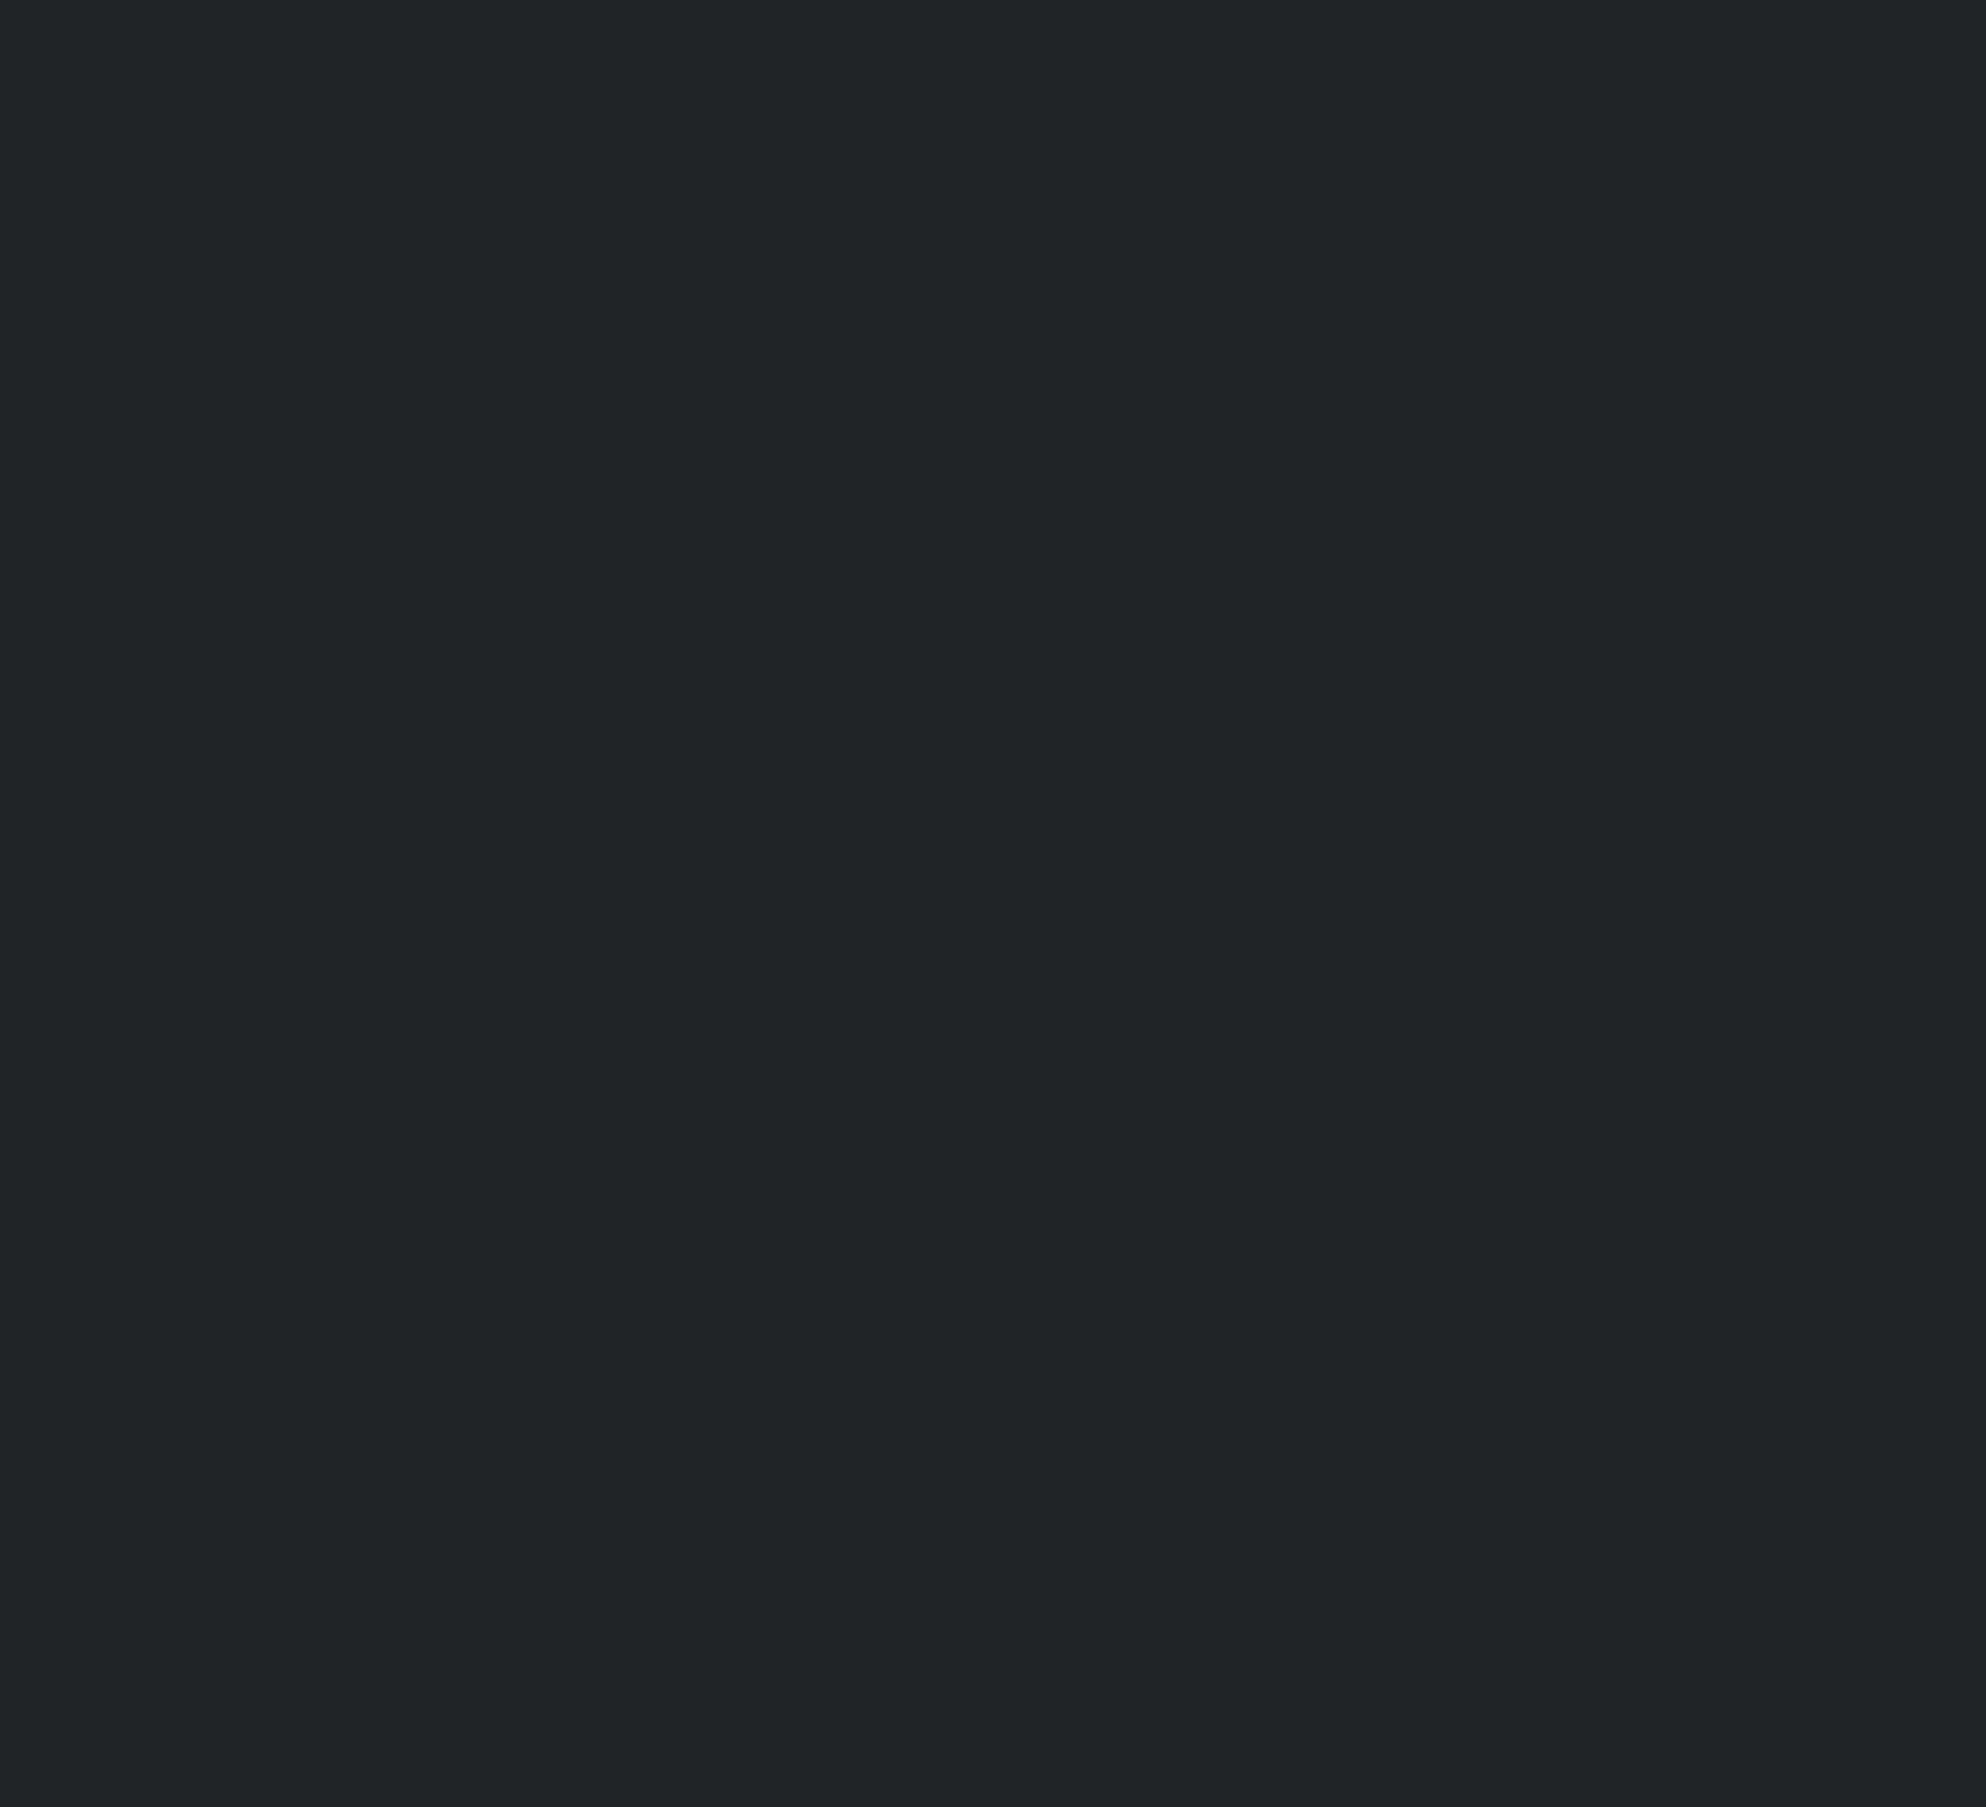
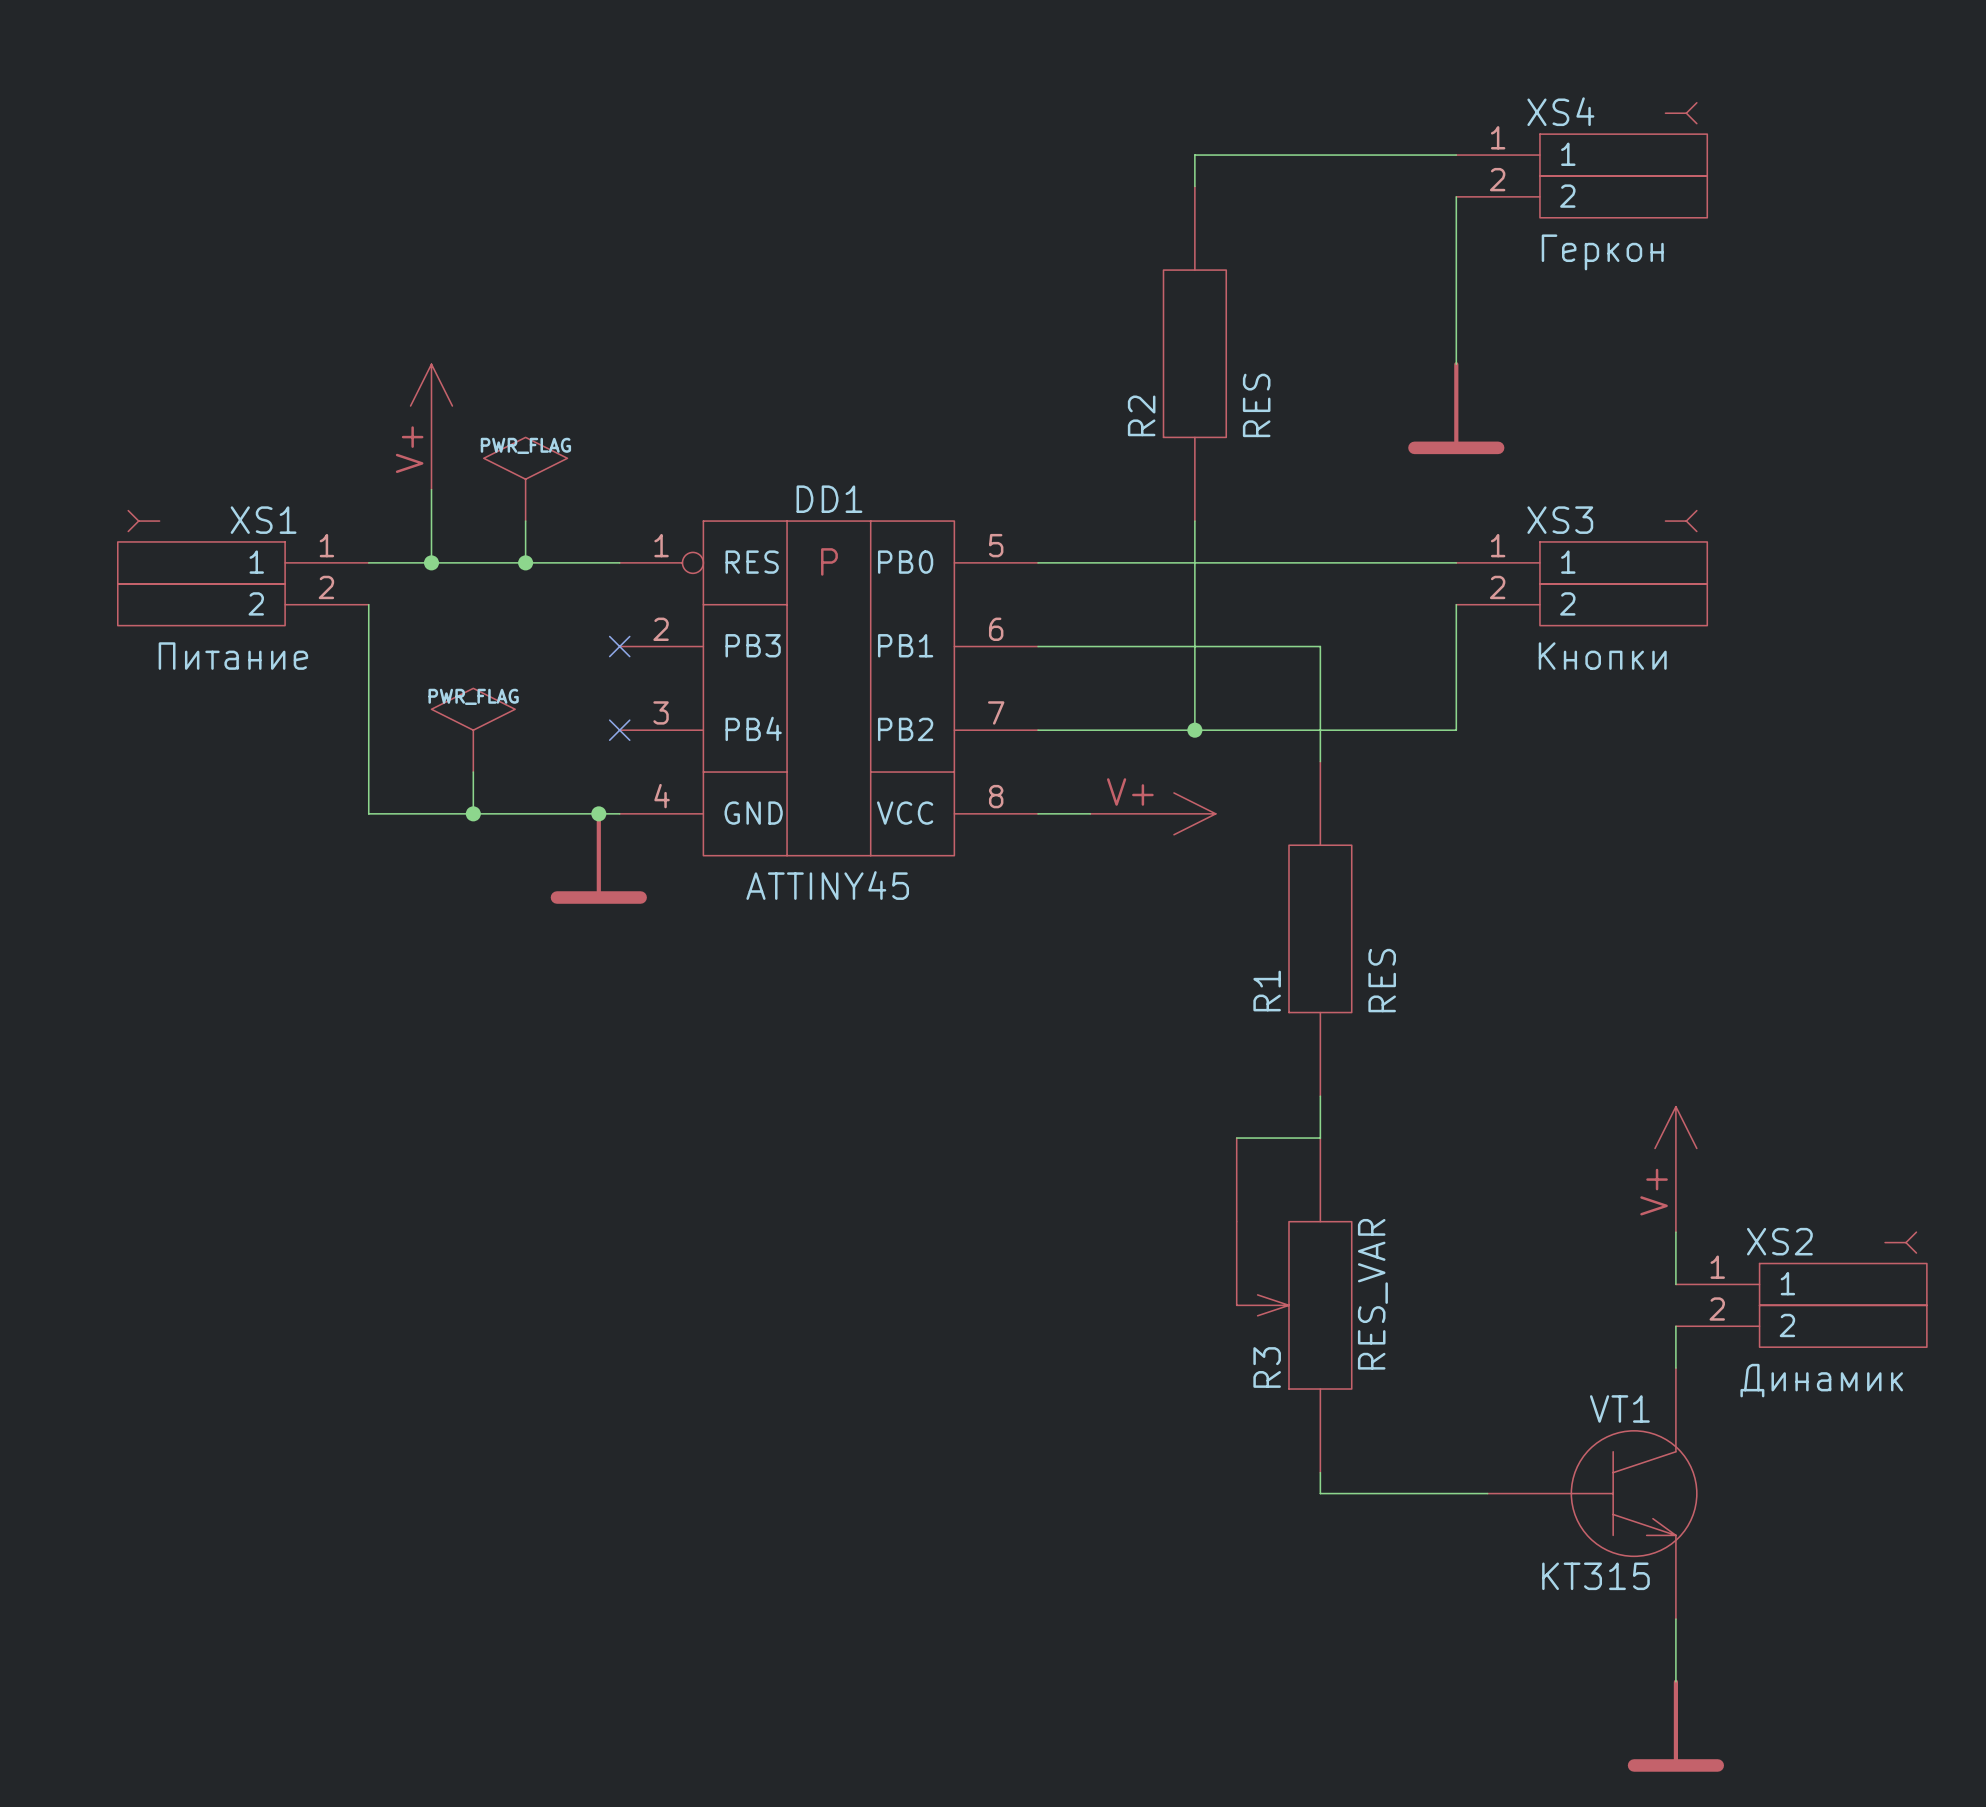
wire: none -> (1456, 155) (1194, 155) (1194, 186)
XS4: none -> Геркон (1581, 160)
wire: none -> (1456, 196) (1456, 364)
R2: none -> RES (1194, 353)
power symbol: none -> (1456, 408)
power symbol: none -> (431, 426)
power symbol: none -> PWR_FLAG (525, 479)
wire: none -> (431, 489) (431, 562)
wire: none -> (525, 521) (525, 562)
wire: none -> (1194, 521) (1194, 730)
wire: none -> (368, 562) (619, 562)
junction: none -> (431, 562)
junction: none -> (525, 562)
wire: none -> (1038, 562) (1456, 562)
XS1: none -> Питание (243, 568)
XS3: none -> Кнопки (1581, 568)
wire: none -> (368, 604) (368, 813) (619, 813)
wire: none -> (1456, 604) (1456, 730) (1038, 730)
no-connect mark: none -> (619, 646)
wire: none -> (1038, 646) (1320, 646) (1320, 761)
DD1: none -> ATTINY45 (828, 688)
power symbol: none -> PWR_FLAG (473, 730)
no-connect mark: none -> (619, 730)
junction: none -> (1194, 730)
wire: none -> (473, 772) (473, 813)
junction: none -> (473, 813)
junction: none -> (598, 813)
wire: none -> (1038, 813) (1090, 813)
power symbol: none -> (1153, 813)
power symbol: none -> (598, 857)
R1: none -> RES (1320, 928)
wire: none -> (1320, 1096) (1320, 1138) (1236, 1138)
power symbol: none -> (1675, 1169)
wire: none -> (1675, 1232) (1675, 1284)
XS2: none -> Динамик (1801, 1289)
R3: none -> RES_VAR (1294, 1305)
wire: none -> (1675, 1326) (1675, 1368)
wire: none -> (1320, 1472) (1320, 1493) (1487, 1493)
VT1: none -> КТ315 (1592, 1493)
wire: none -> (1675, 1619) (1675, 1681)
power symbol: none -> (1675, 1725)

